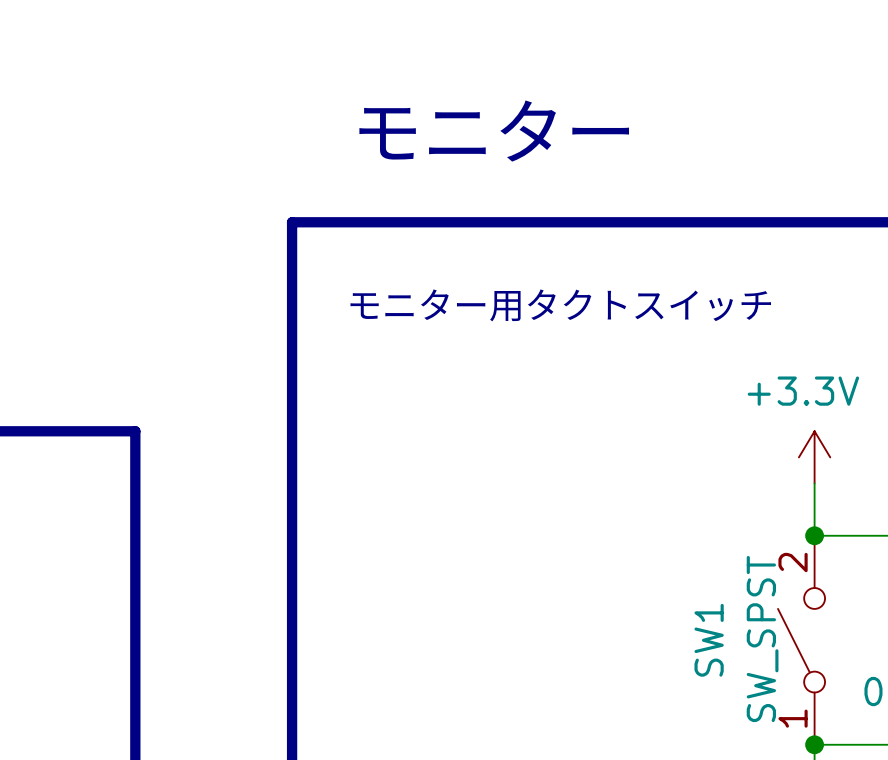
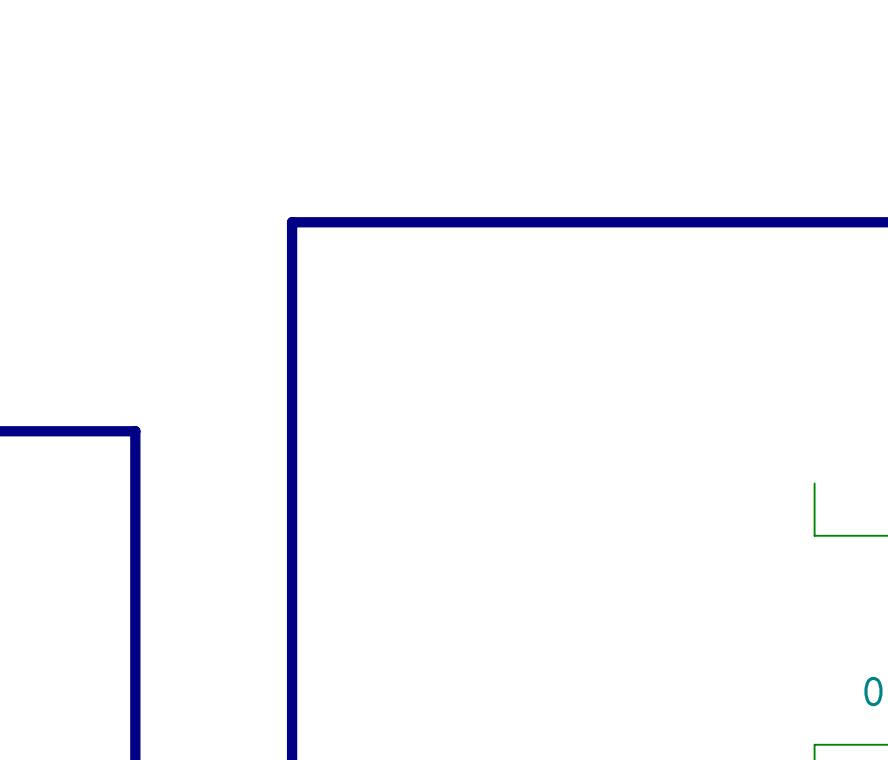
text: モニター (494, 131) -> none
text: モニター用タクトスイッチ (560, 305) -> none
power symbol: +3.3V (814, 457) -> none
junction: (814, 535) -> none
SW1: SW_SPST (801, 640) -> none
junction: (814, 744) -> none

